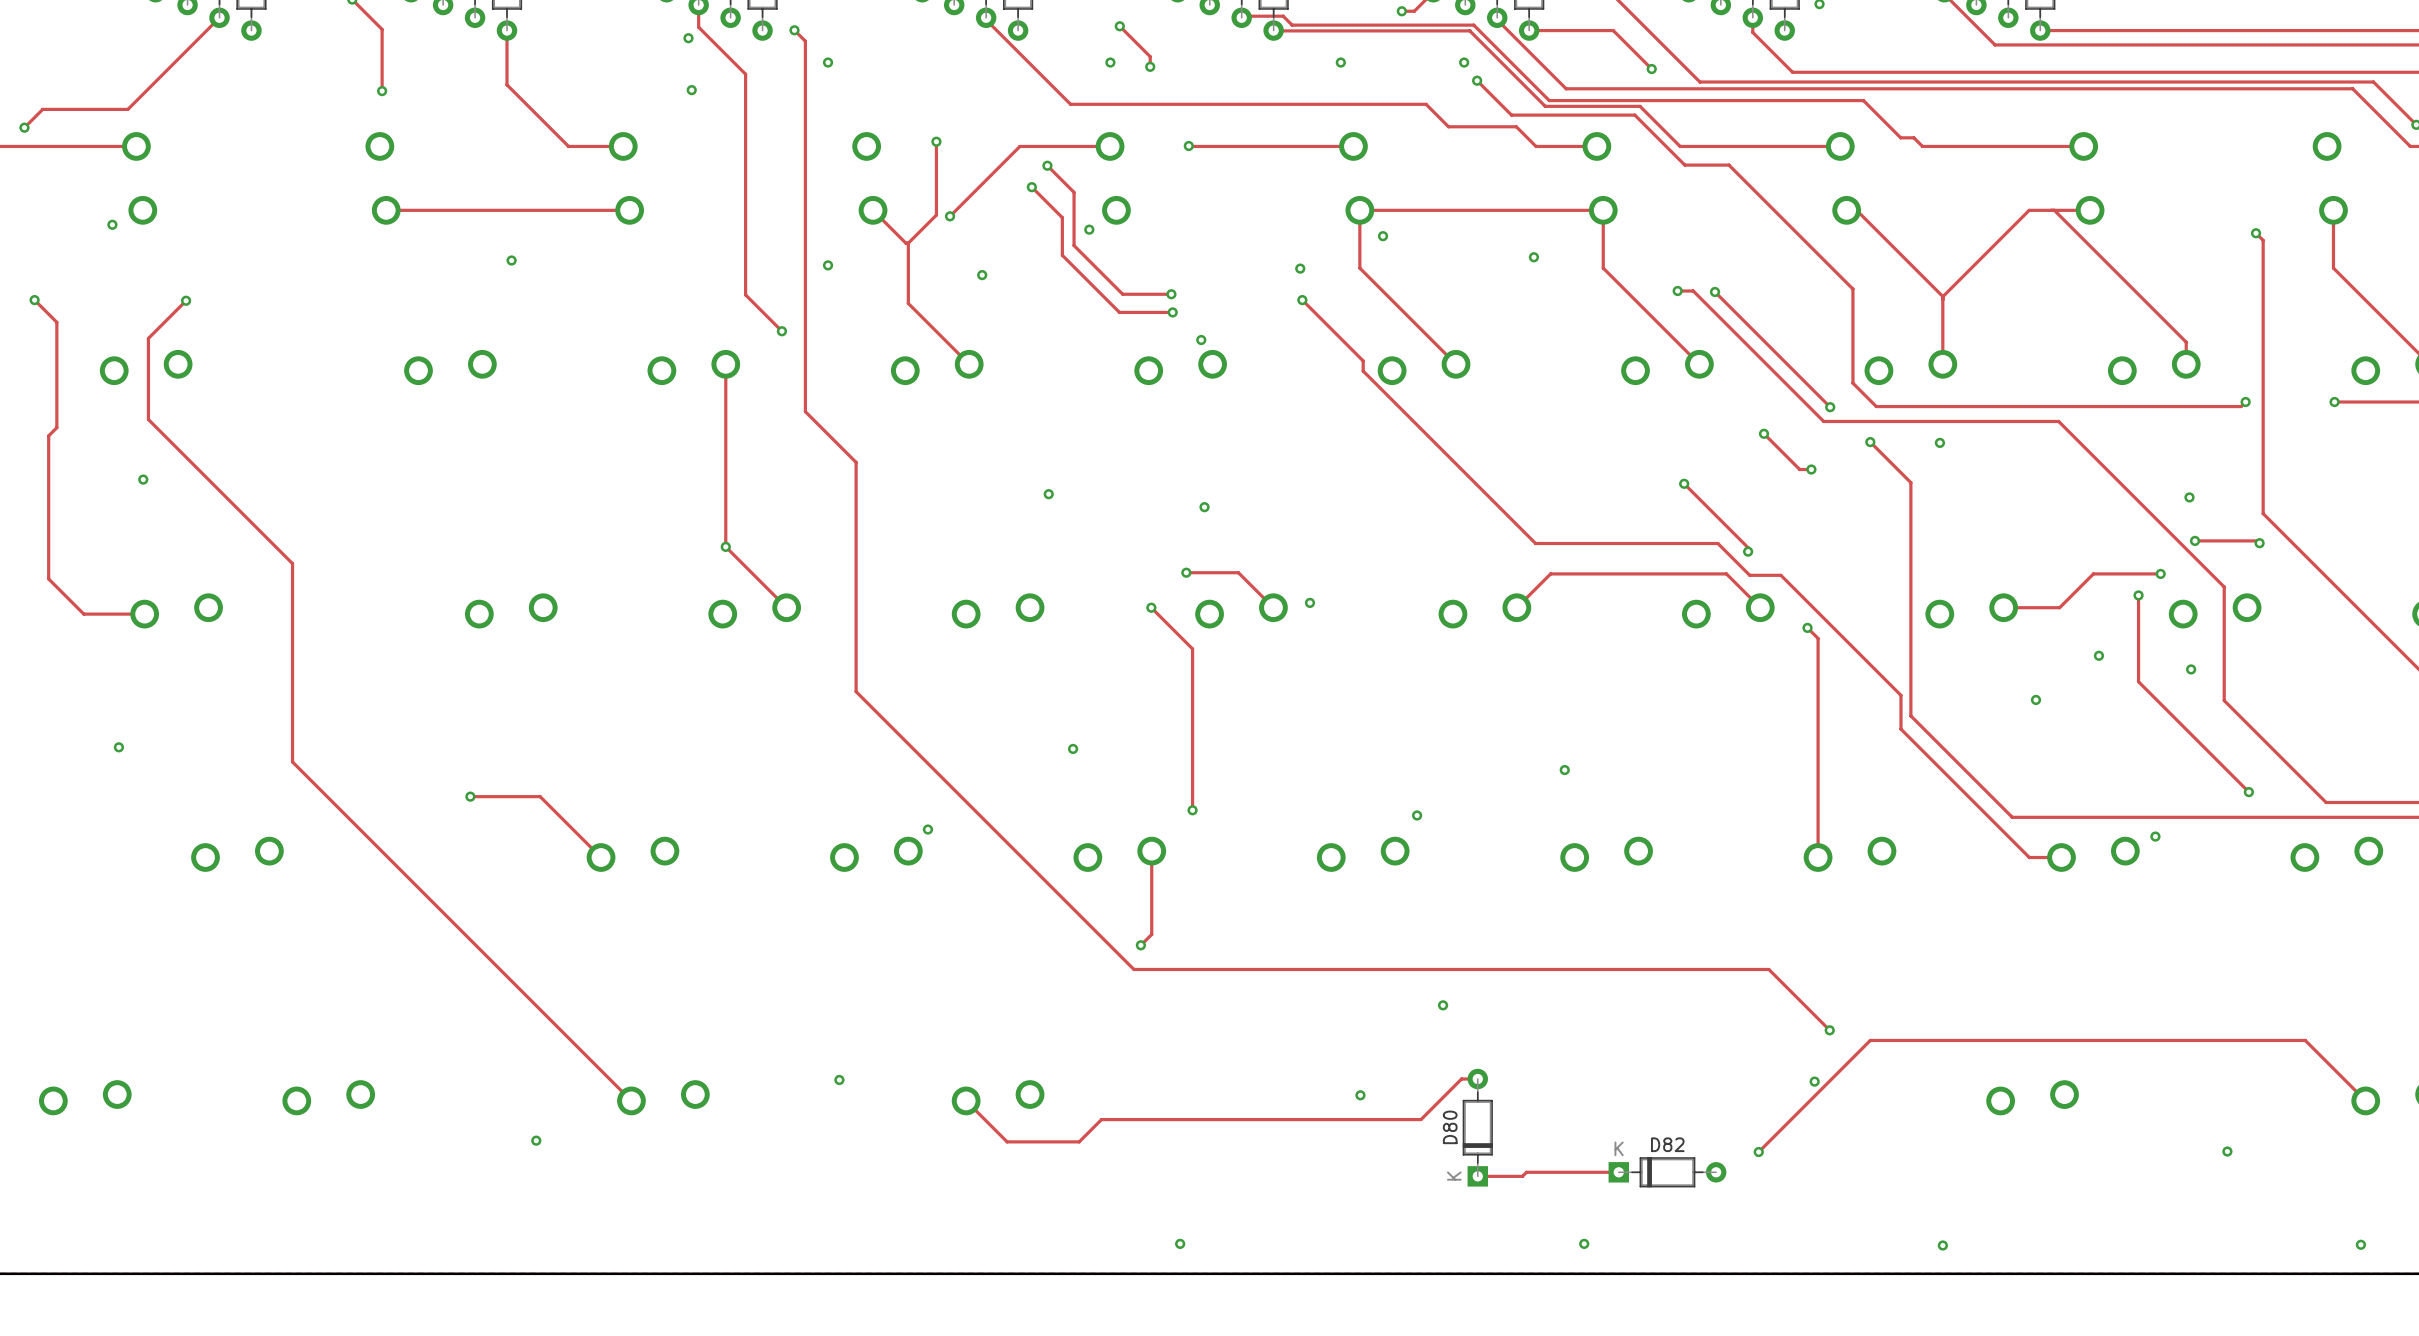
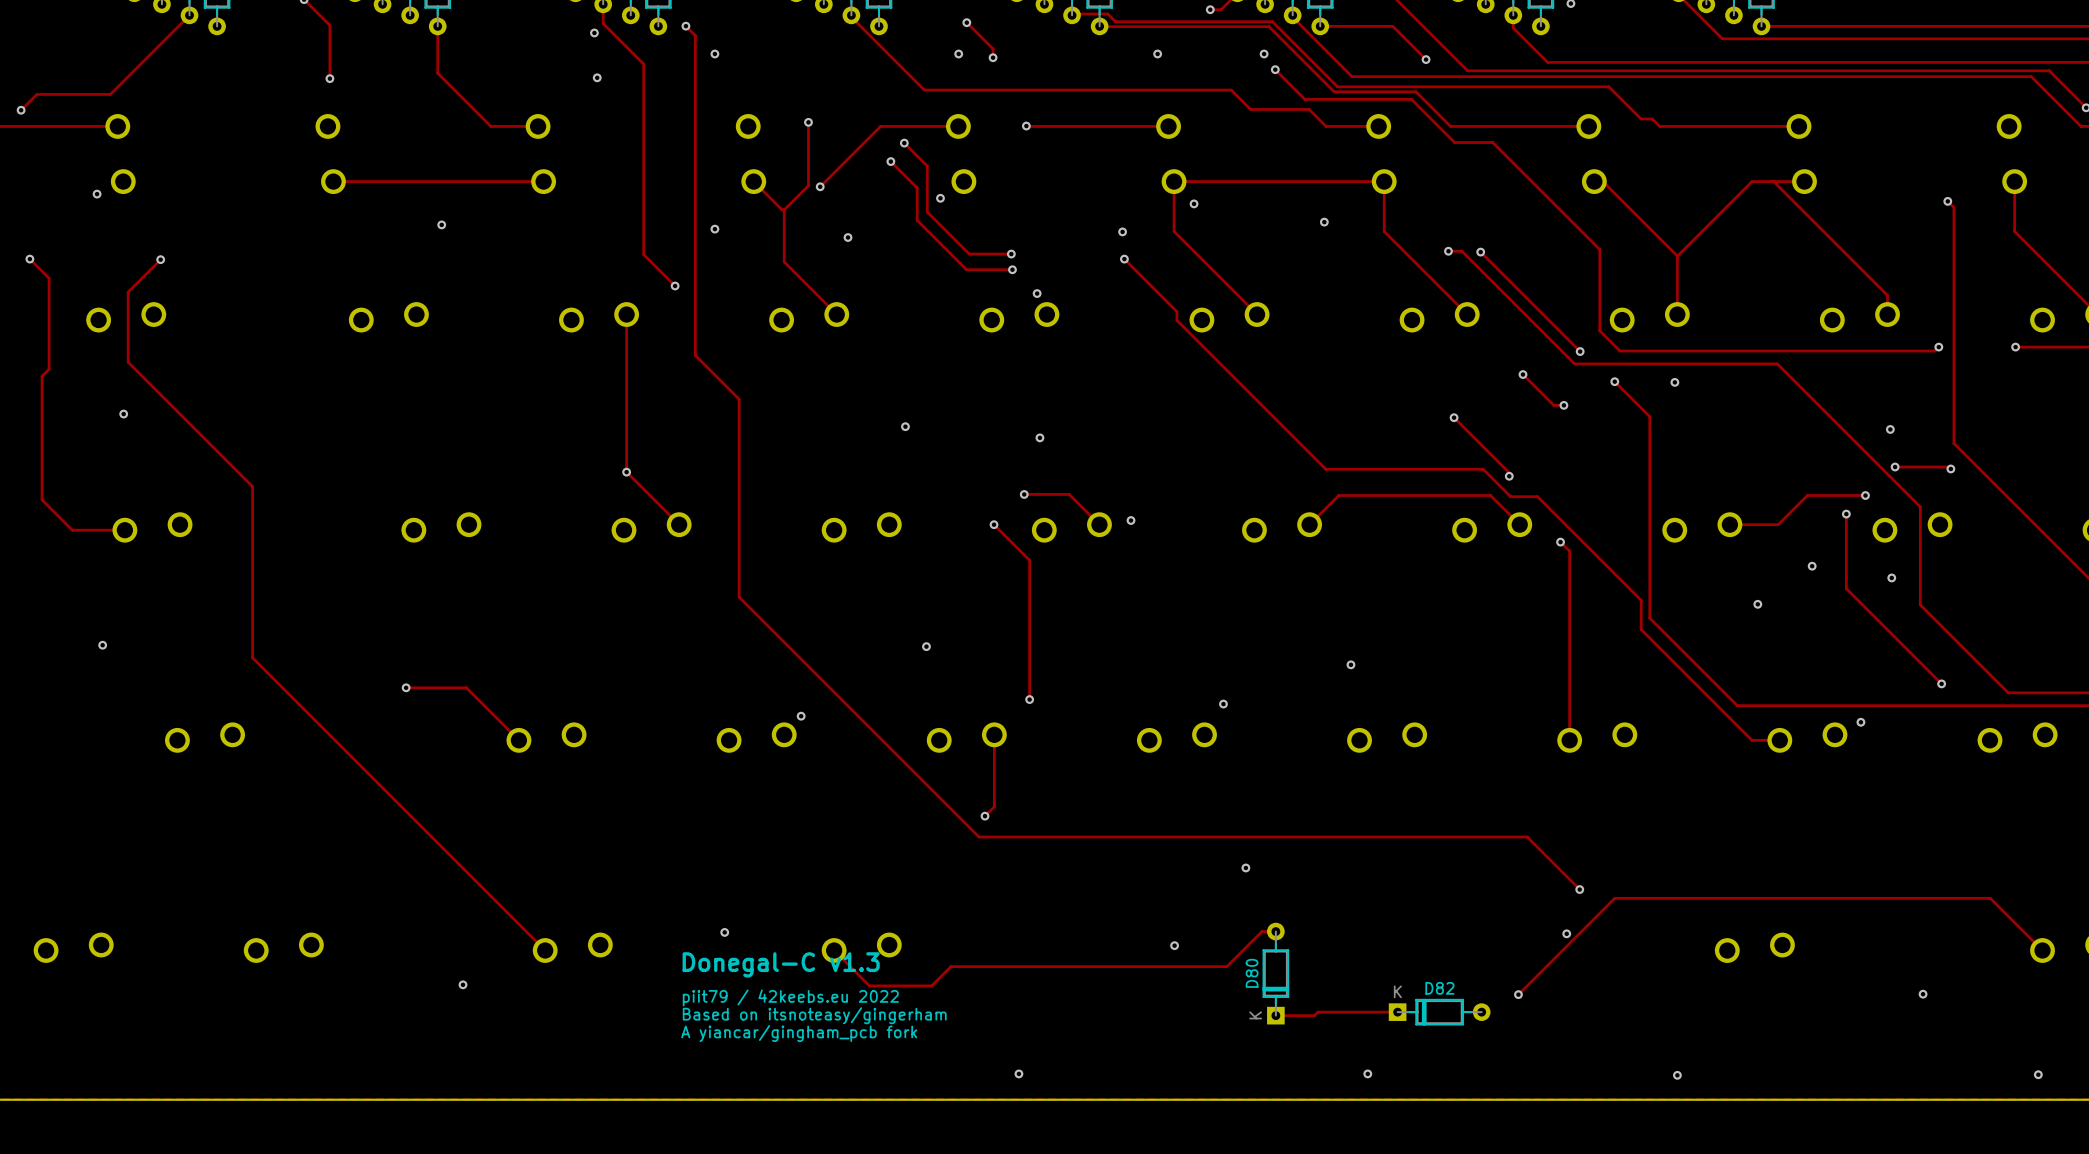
text: none -> Donegal-C v1.3 (781, 964)
text: none -> piit79 / 42keebs.eu 2022 (790, 997)
text: none -> Based on itsnoteasy/gingerham (814, 1015)
text: none -> A yiancar/gingham_pcb fork (799, 1033)

